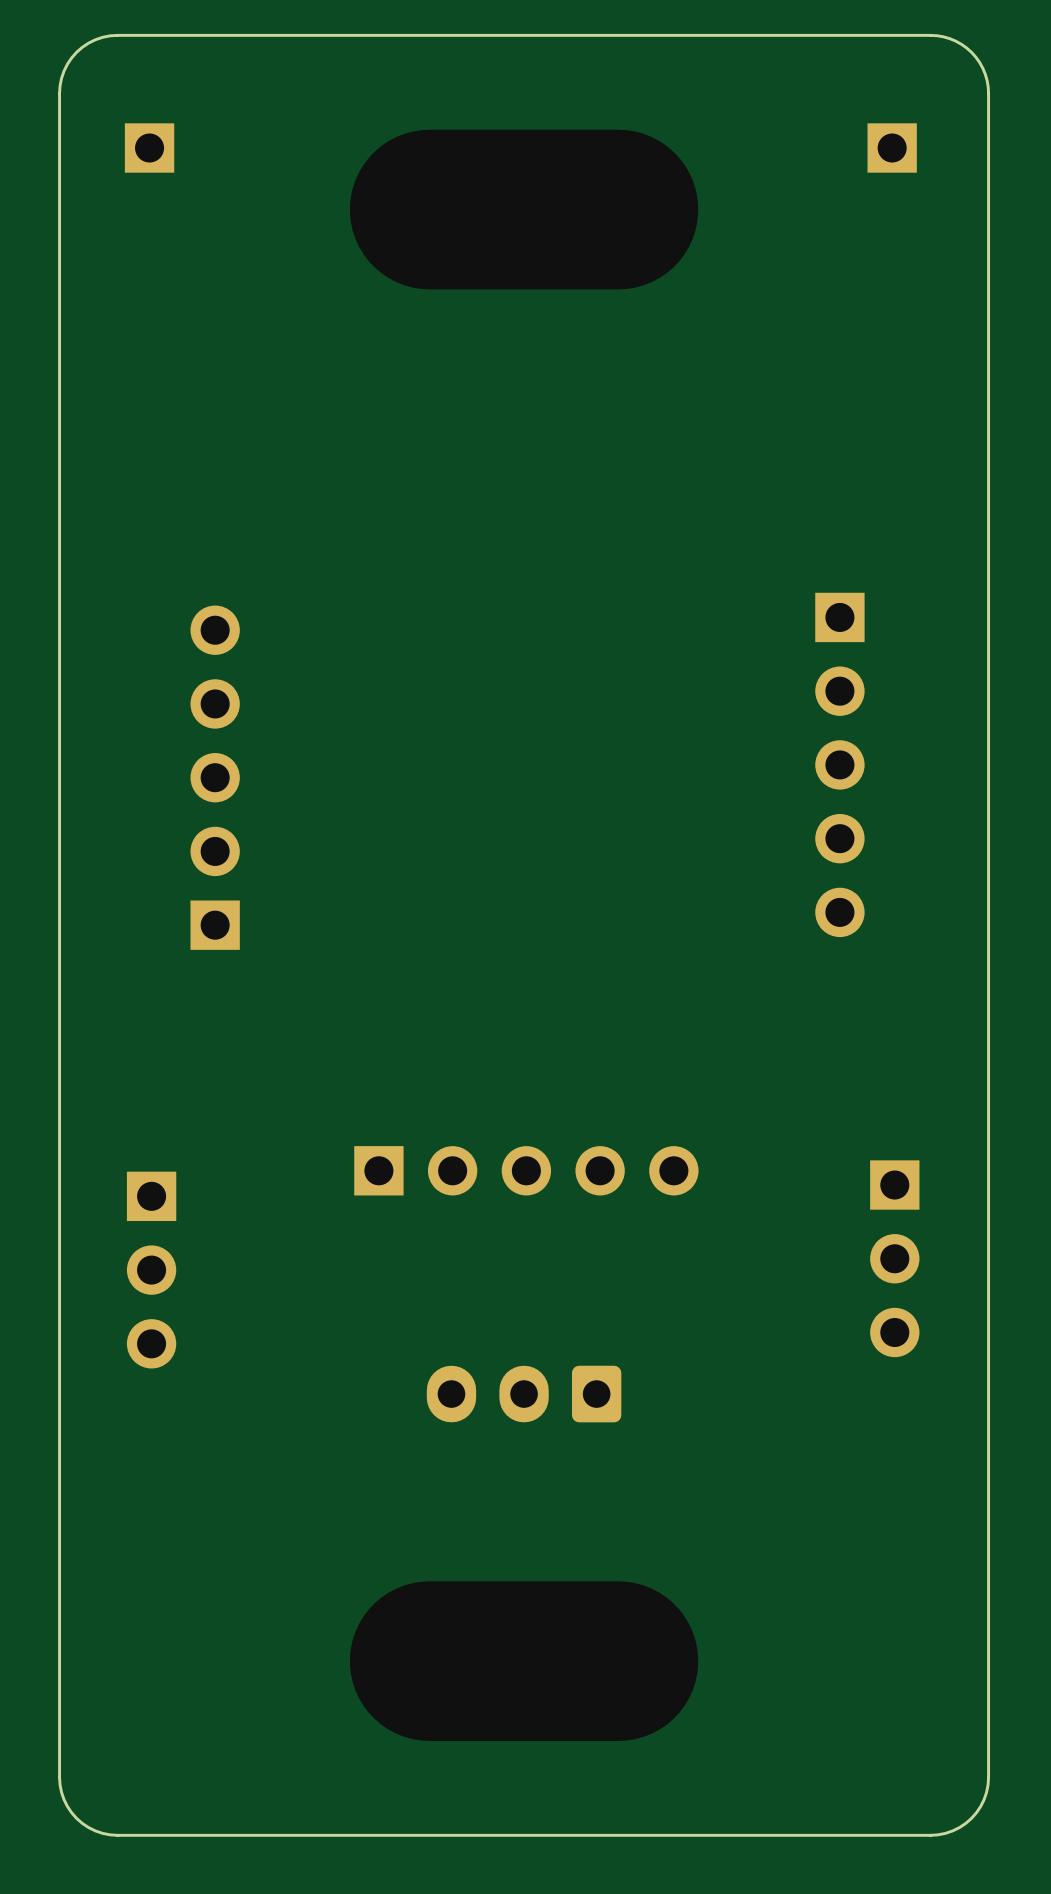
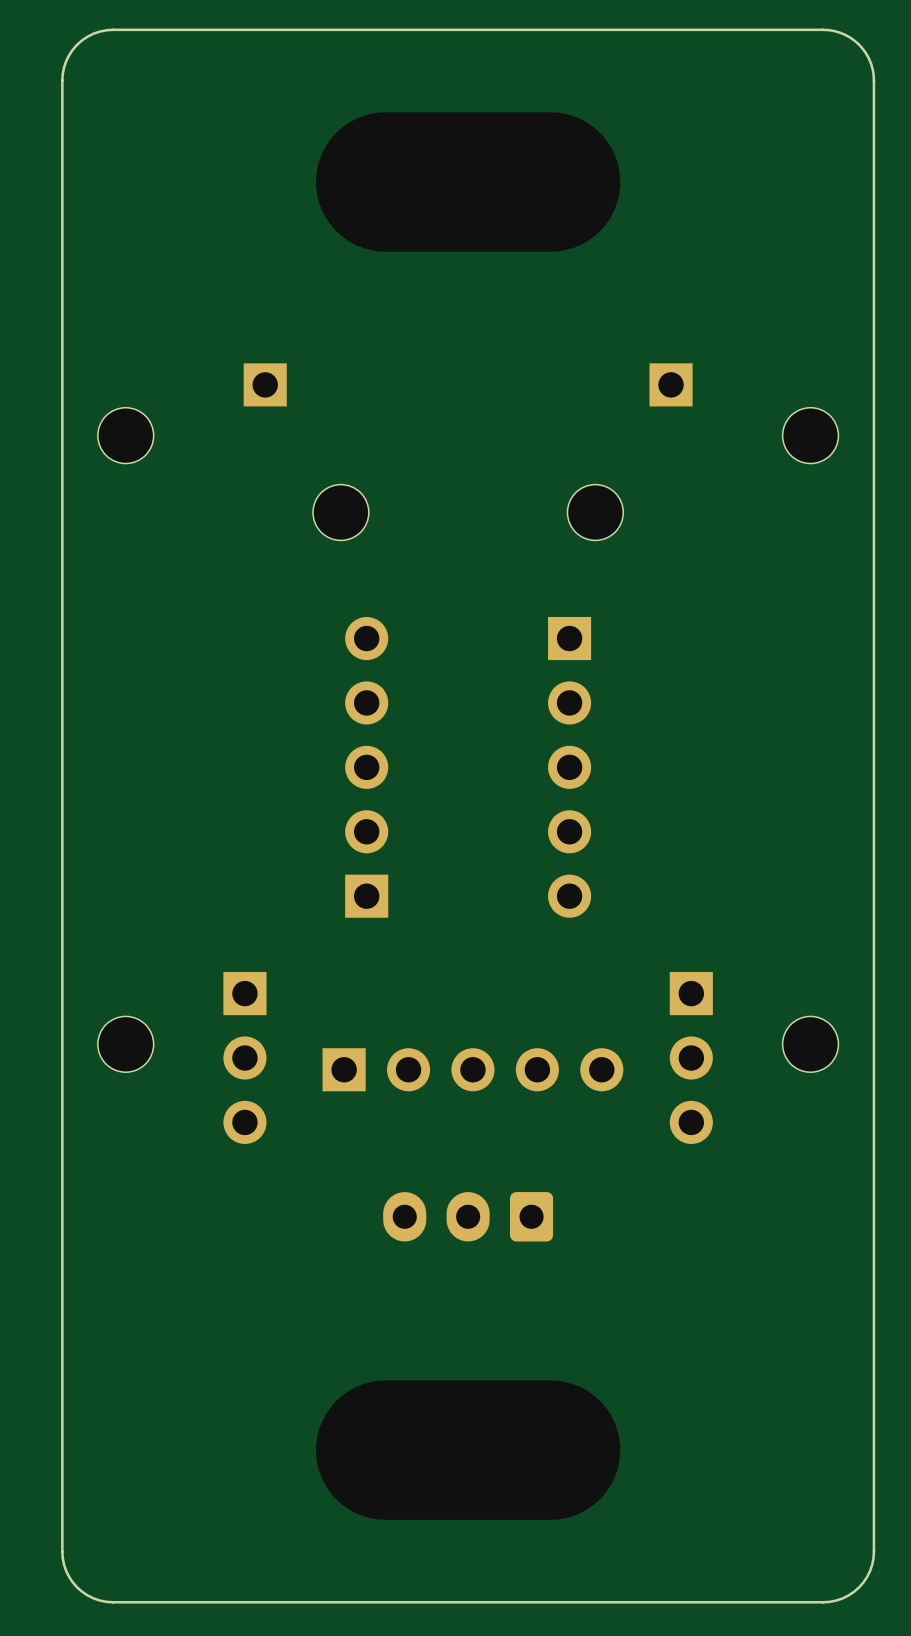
part position: (149, 148) -> (265, 384)
part position: (892, 148) -> (671, 384)
part: none -> (125, 435)
part: none -> (810, 435)
part: none -> (340, 512)
part: none -> (595, 512)
part: (839, 764) -> none
part: (215, 777) -> none
part: none -> (366, 767)
part: none -> (569, 767)
part position: (526, 1170) -> (472, 1069)
part: none -> (125, 1044)
part: none -> (810, 1044)
part position: (894, 1258) -> (691, 1058)
part position: (151, 1270) -> (244, 1058)

